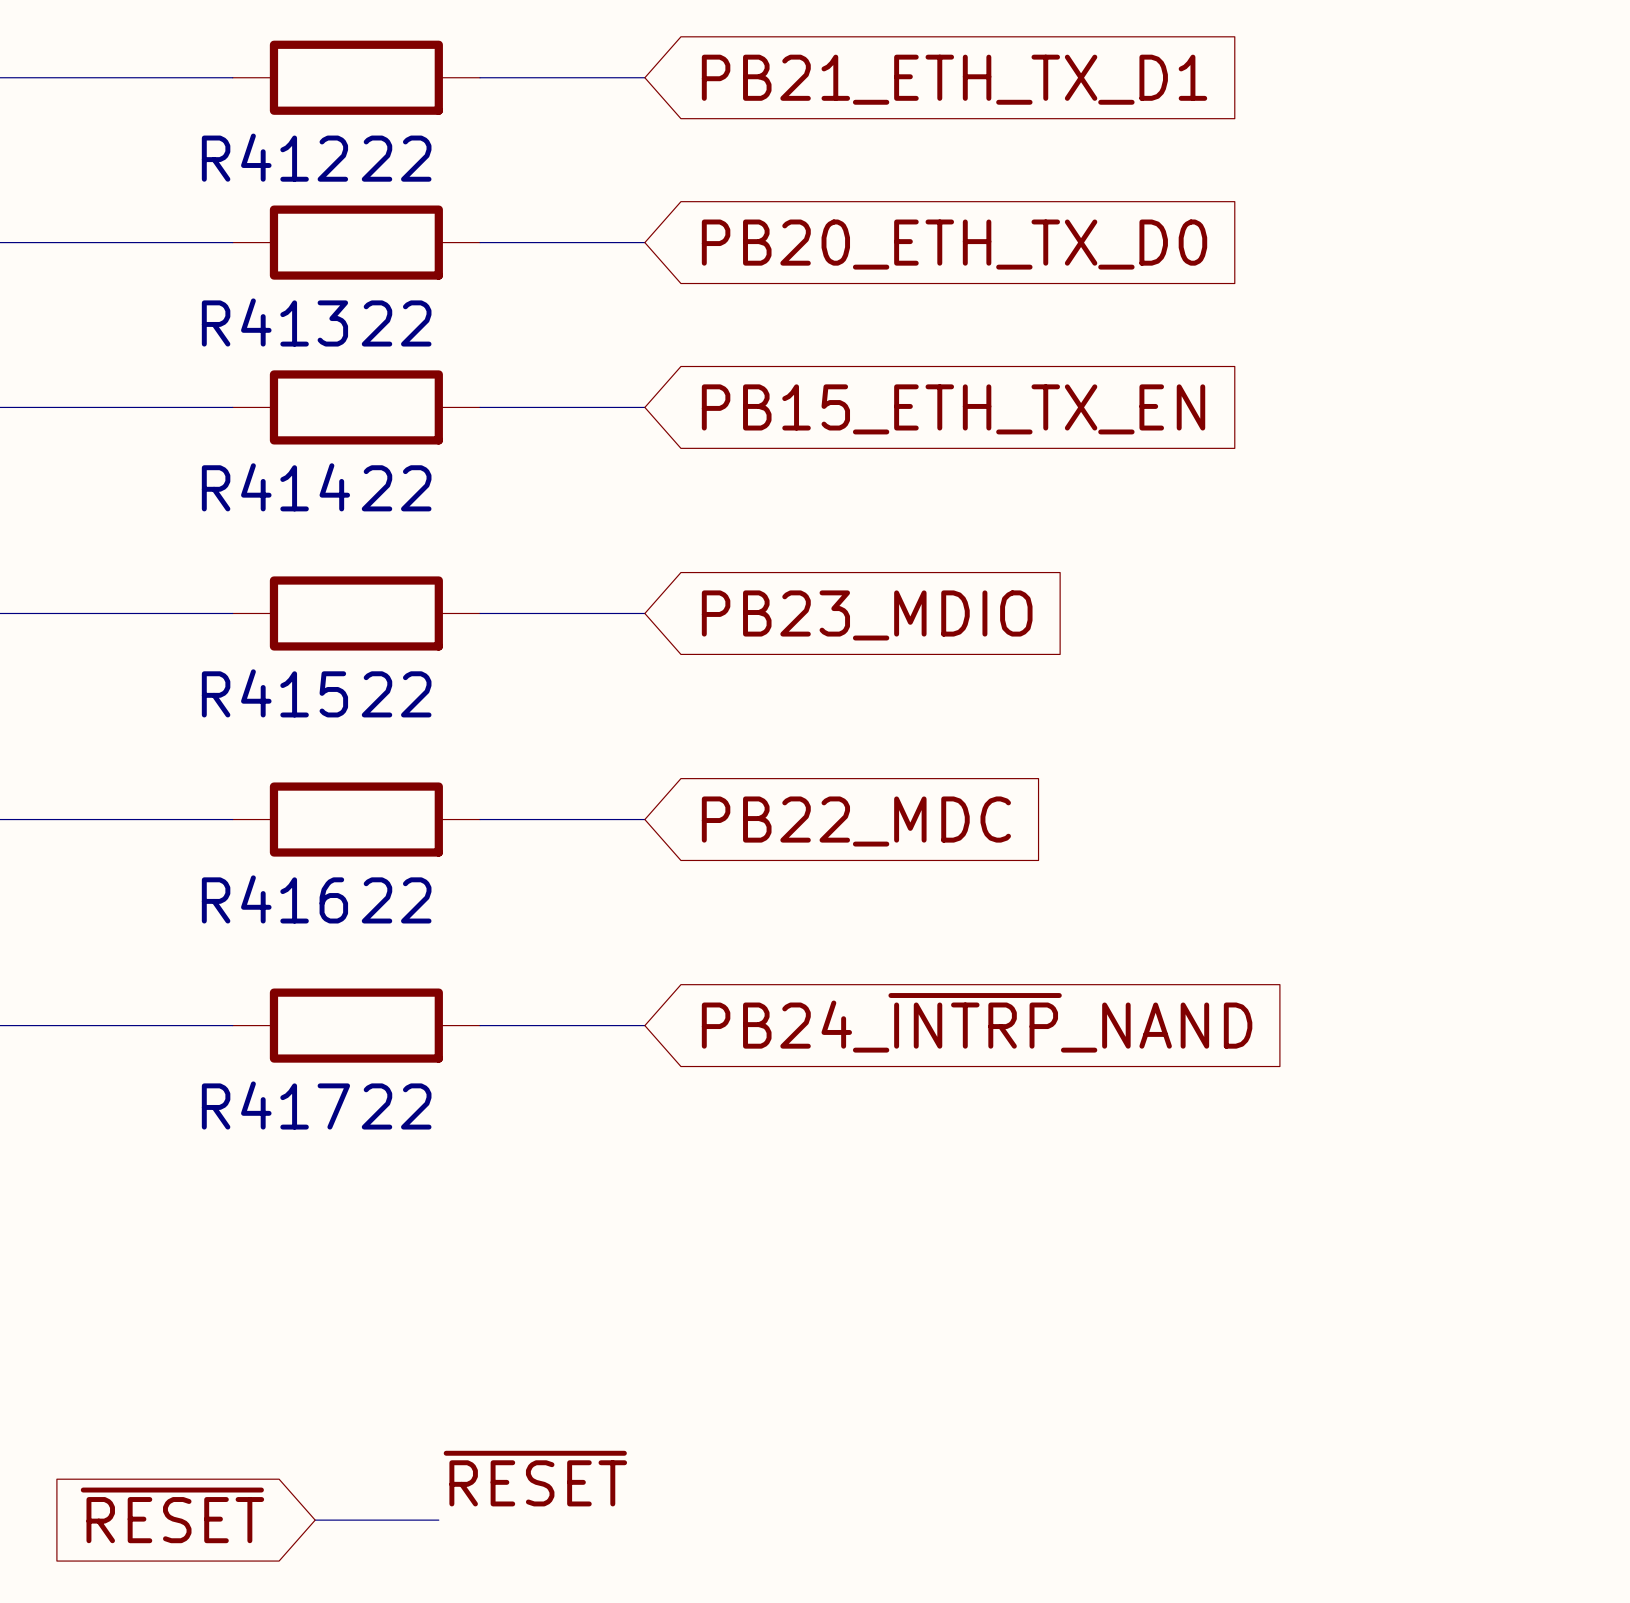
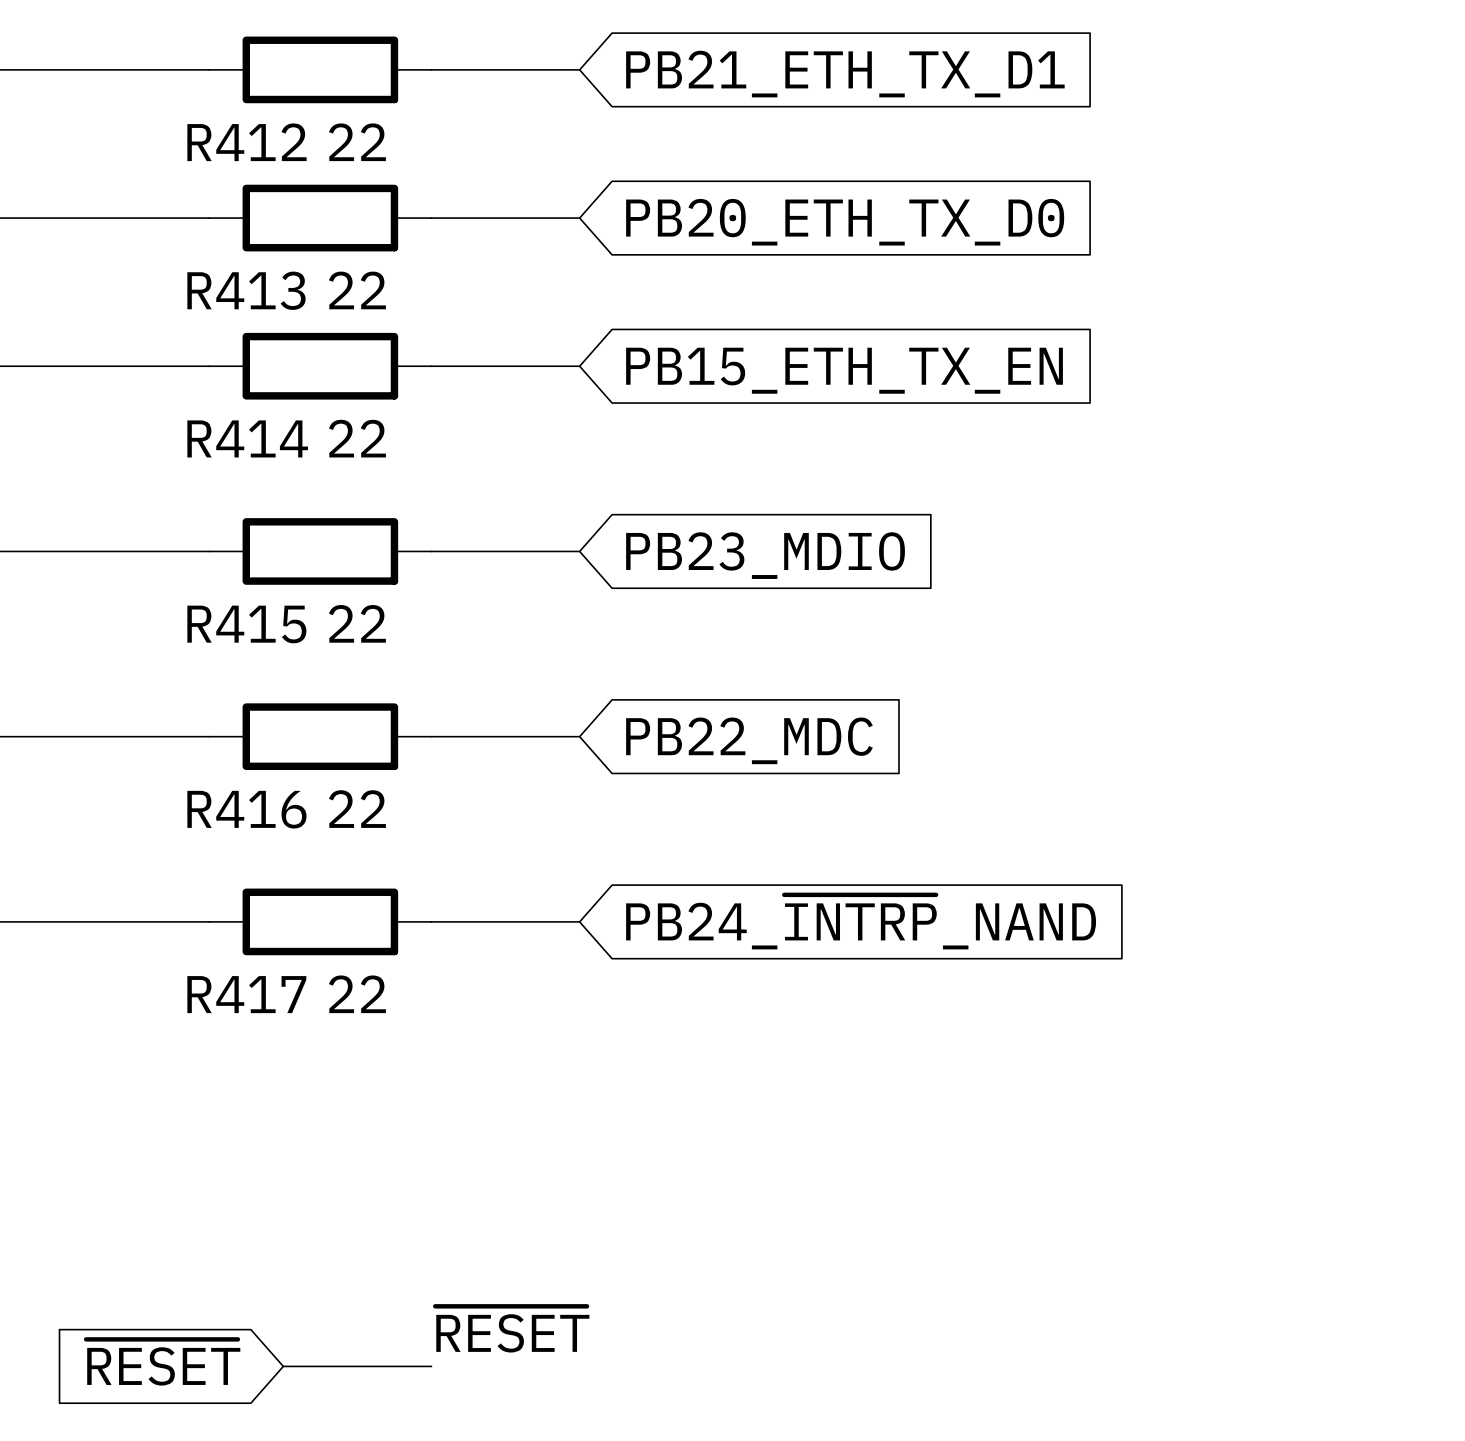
label position: ~{RESET} (535, 1478) -> ~{RESET} (512, 1329)
wire: none -> (394, 1366) (431, 1366)

